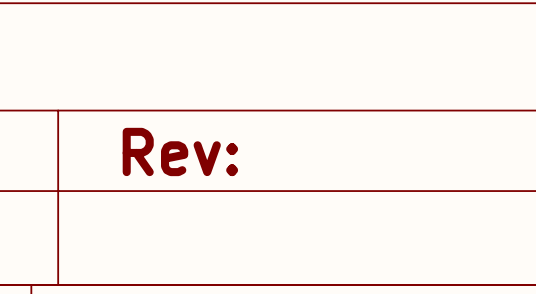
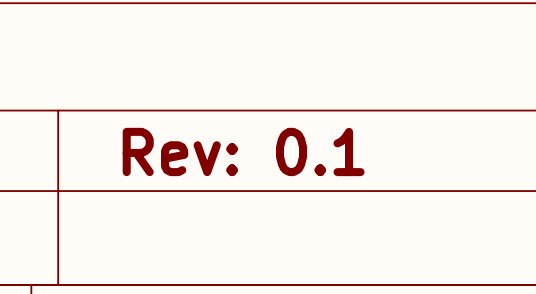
title block: Rev: (180, 151) -> Rev: 0.1 (243, 151)

